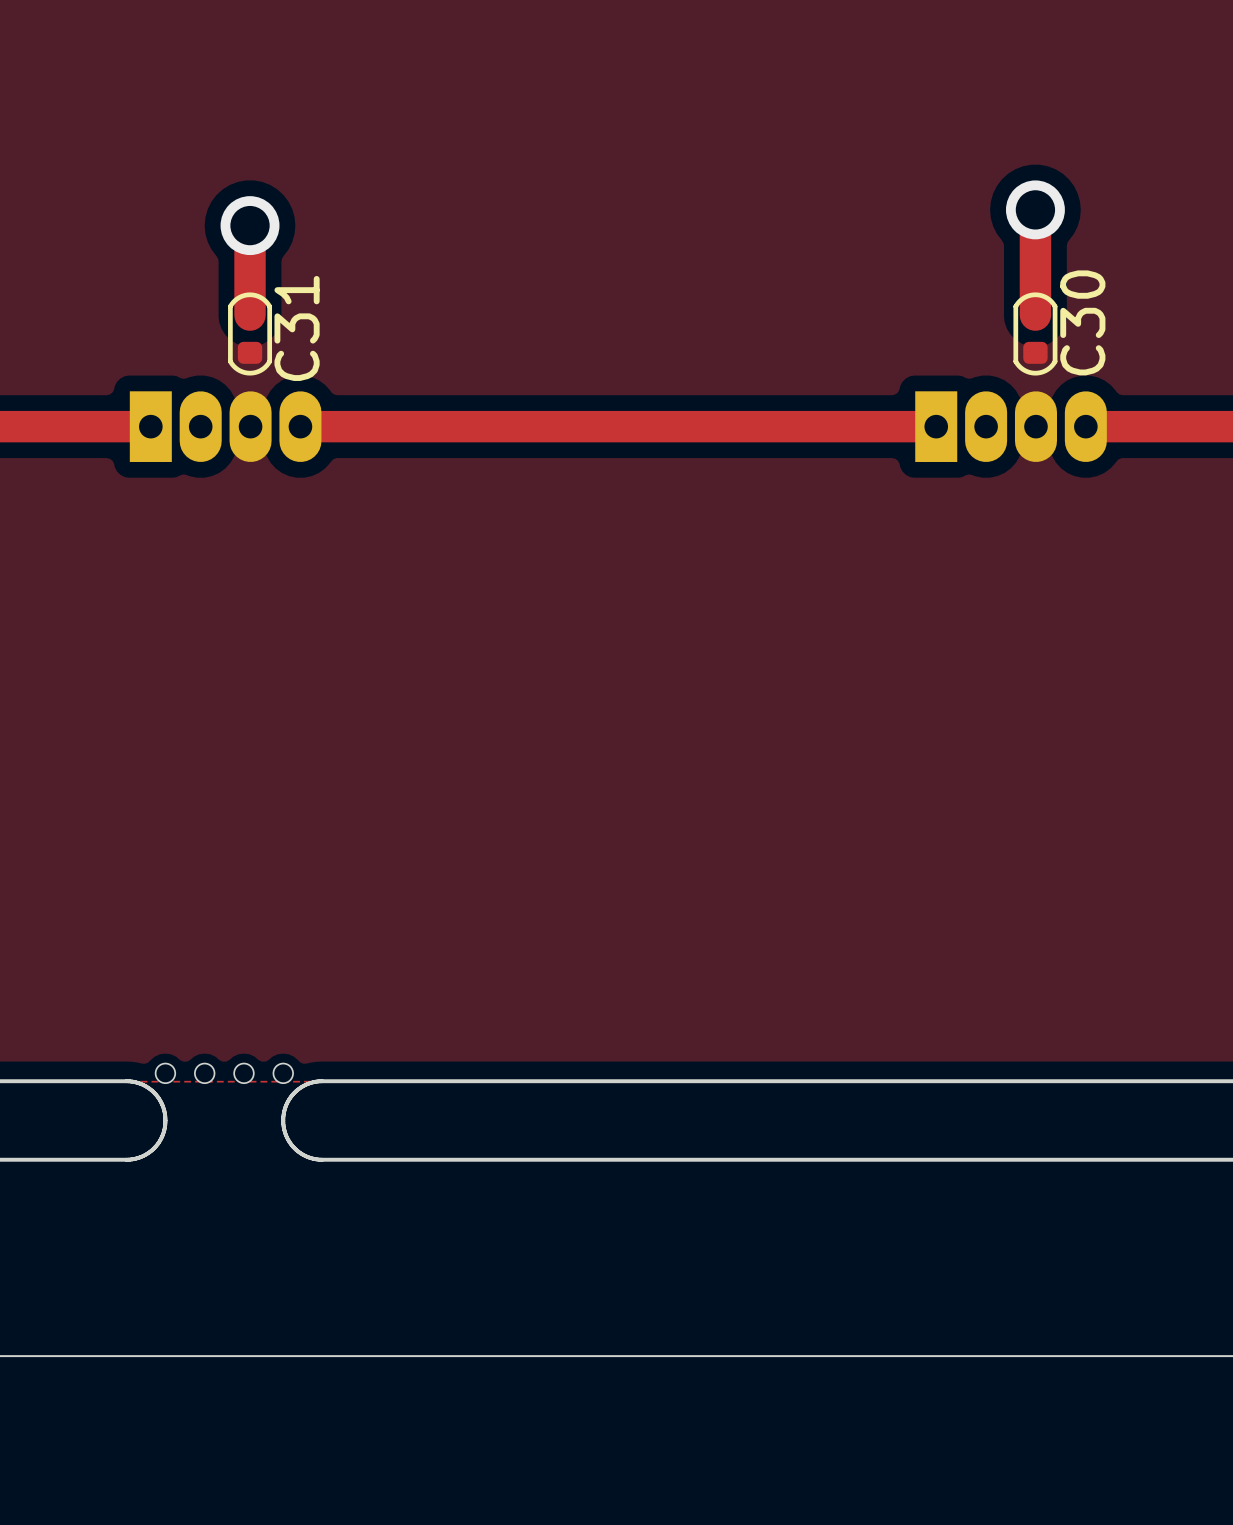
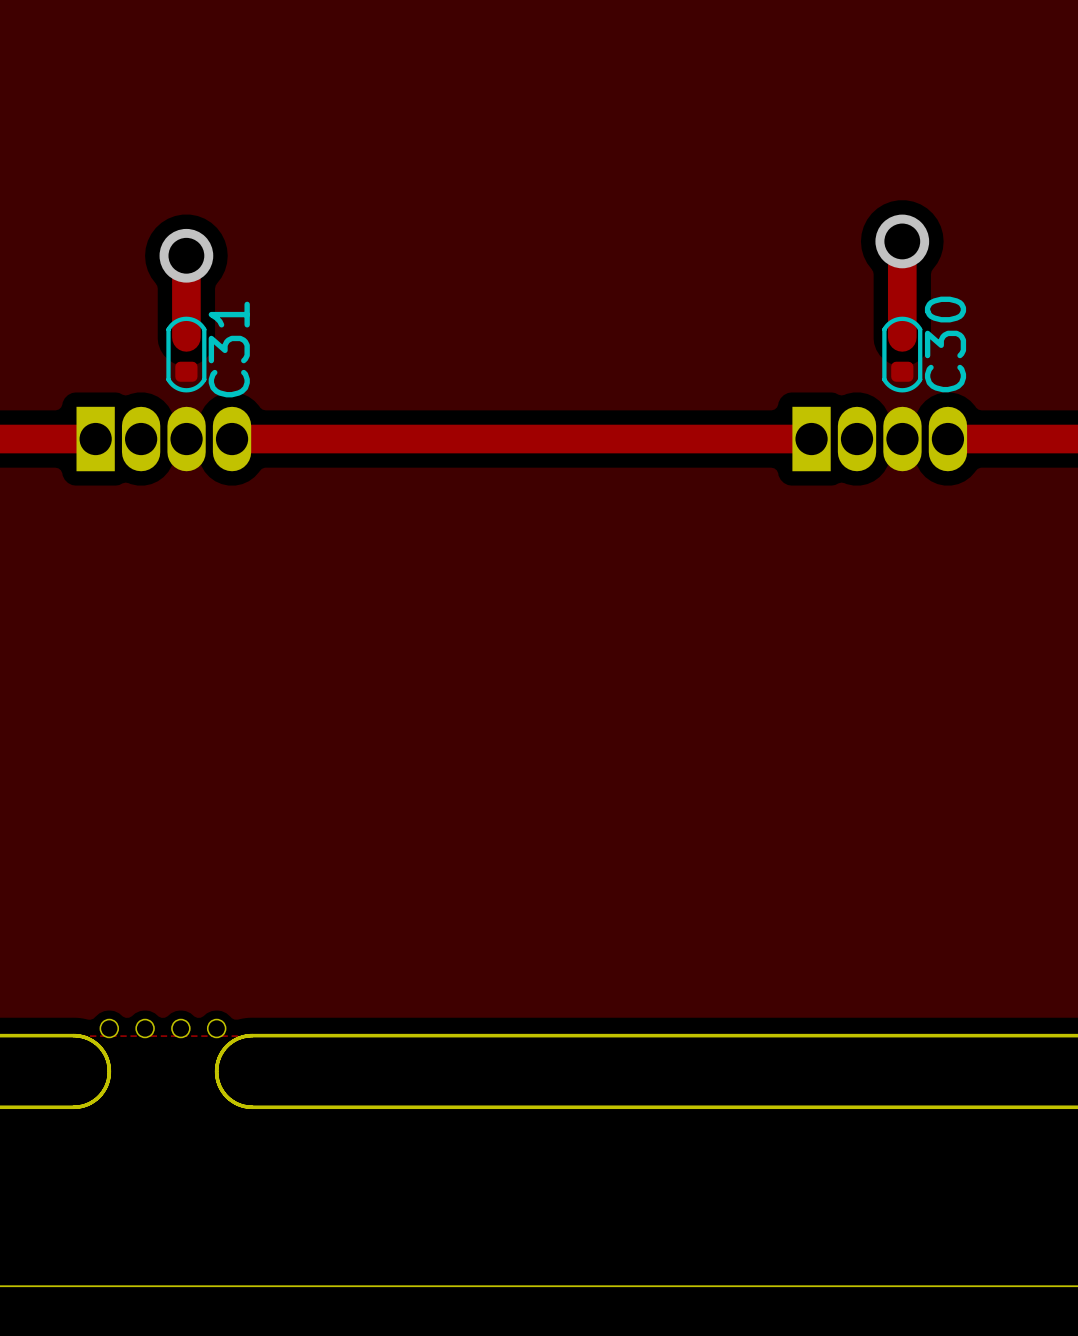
part footprint: [129, 391, 322, 462] -> [76, 406, 252, 472]
part footprint: [915, 391, 1107, 462] -> [792, 406, 968, 472]

